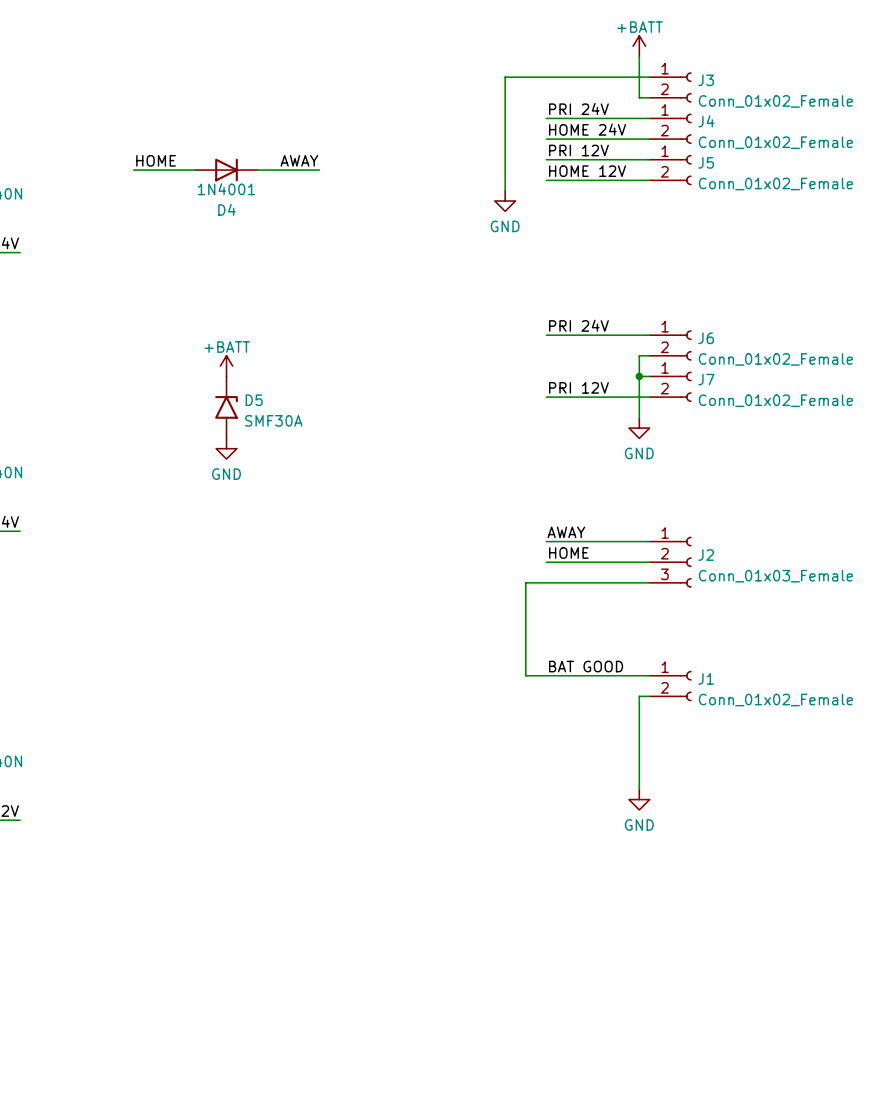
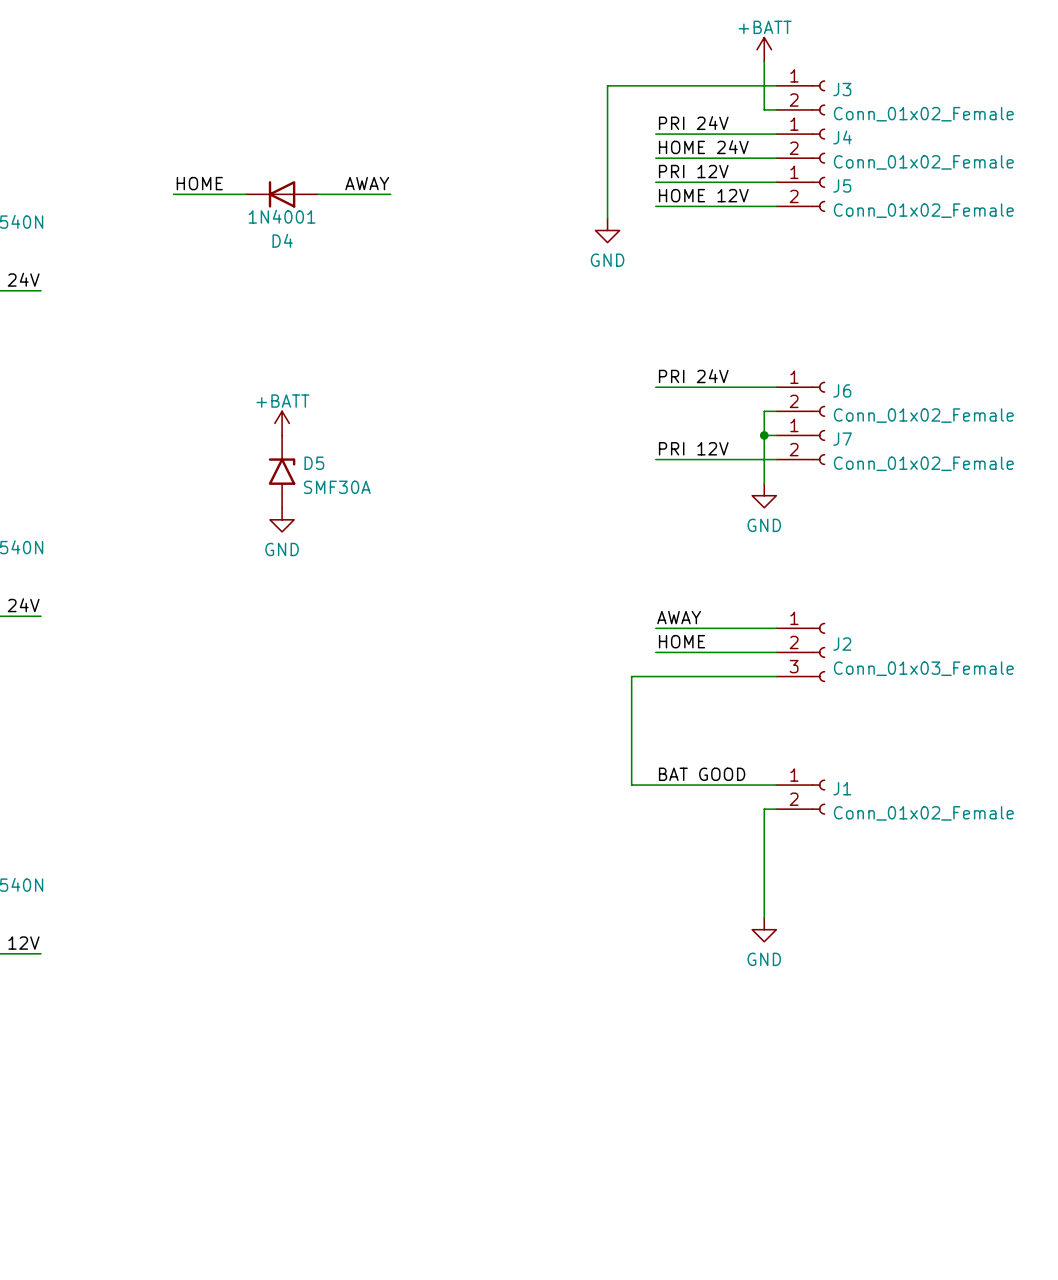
D4 rotation: 0° (226, 170) -> 180° (282, 194)

